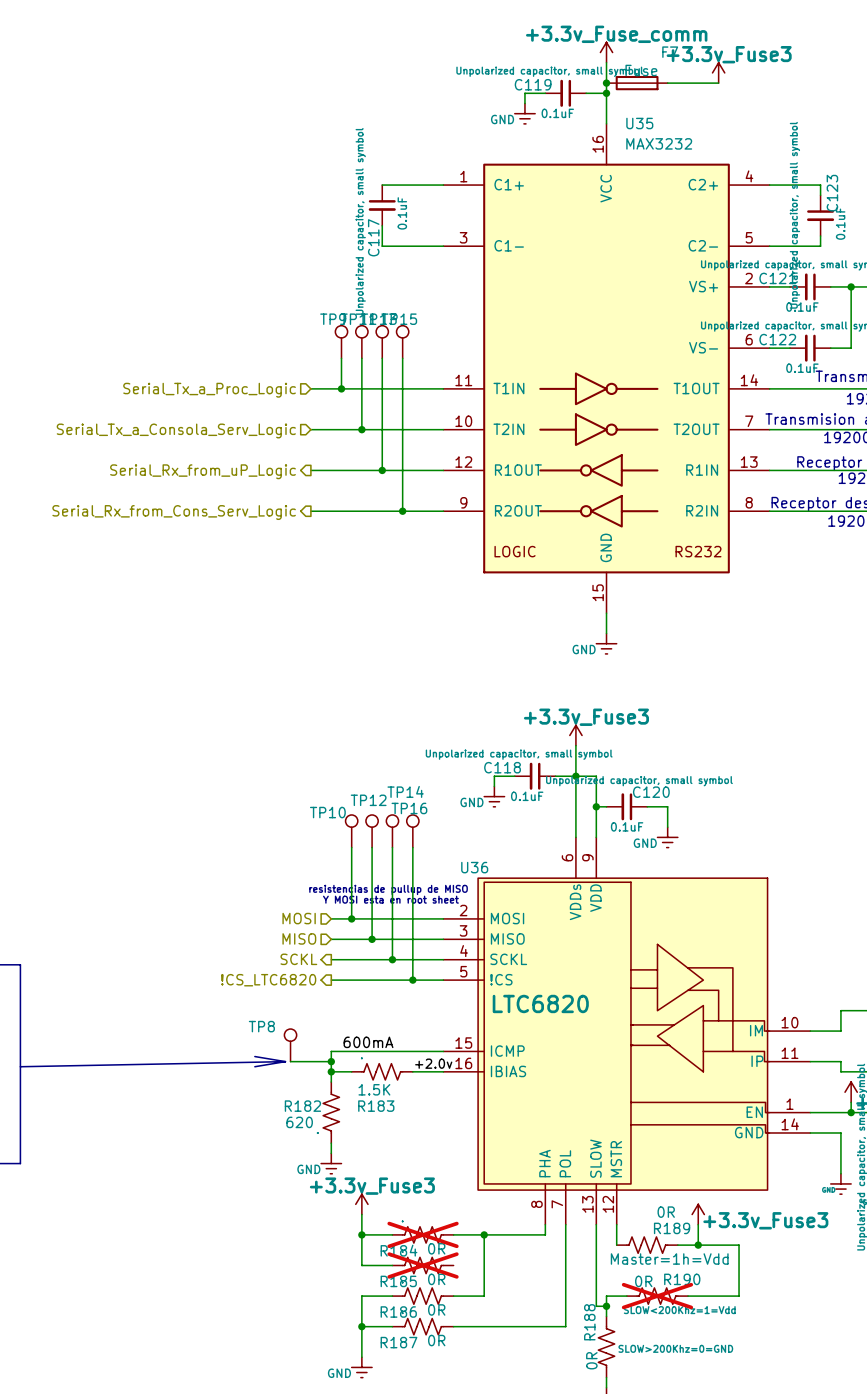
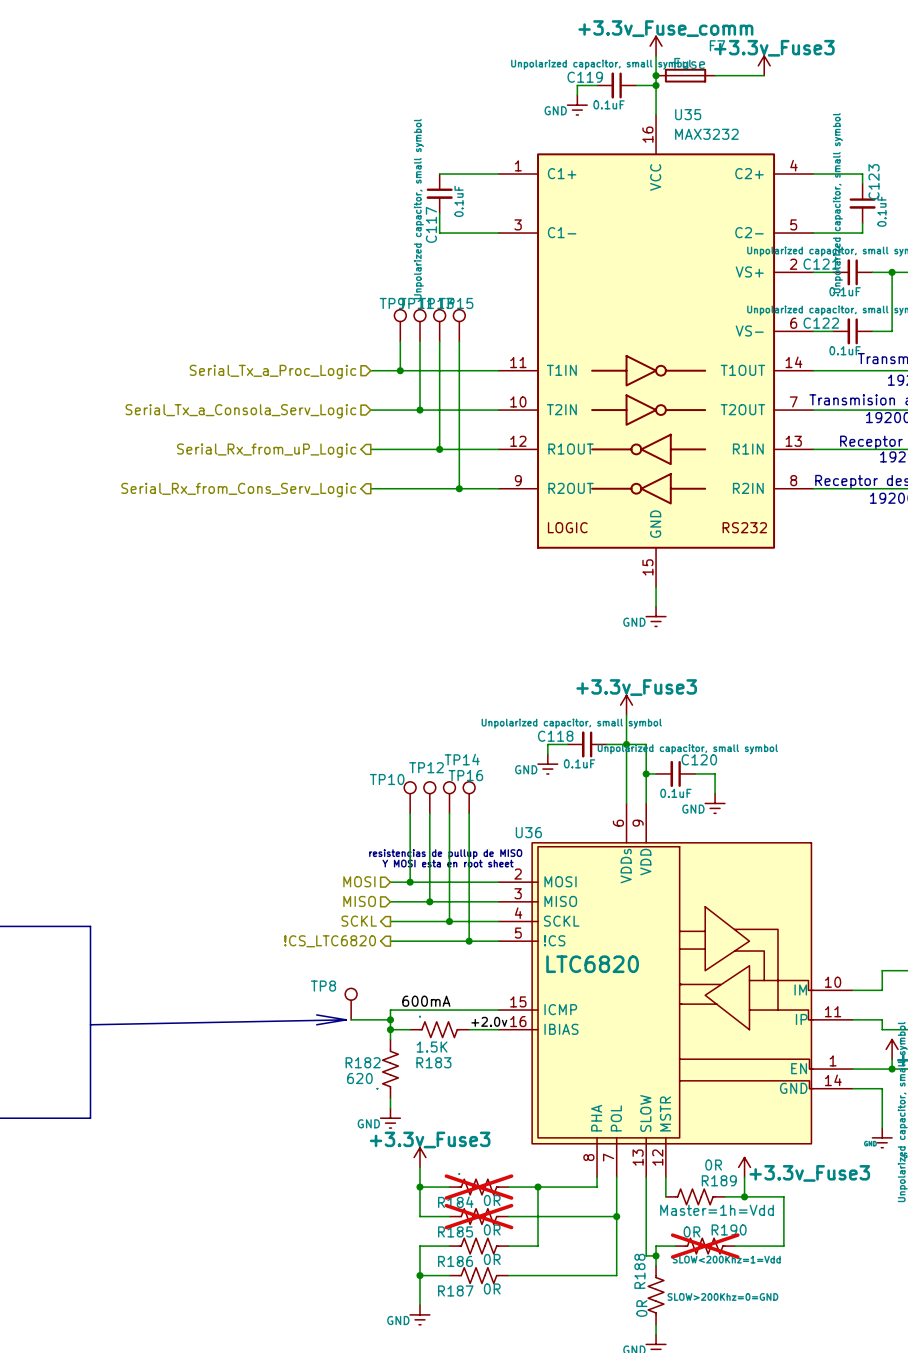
wire: none -> (508, 1216) (616, 1216)
junction: none -> (616, 1216)

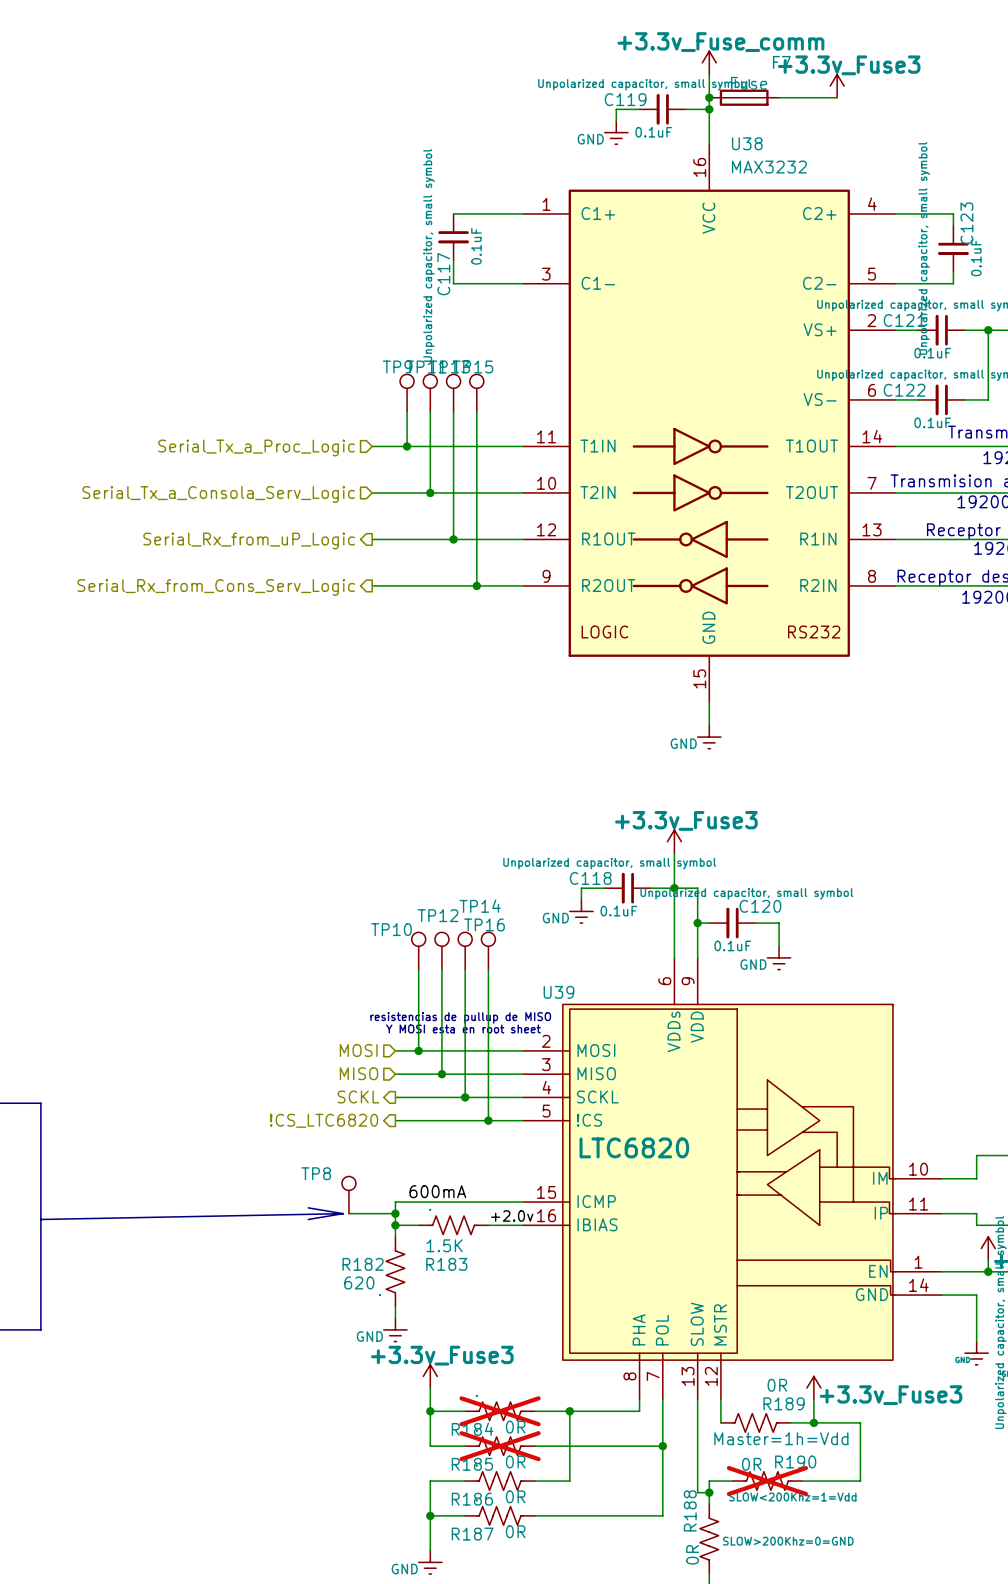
U35 name: U35 (688, 114) -> U38 (747, 143)
U36 name: U36 (528, 832) -> U39 (558, 992)

